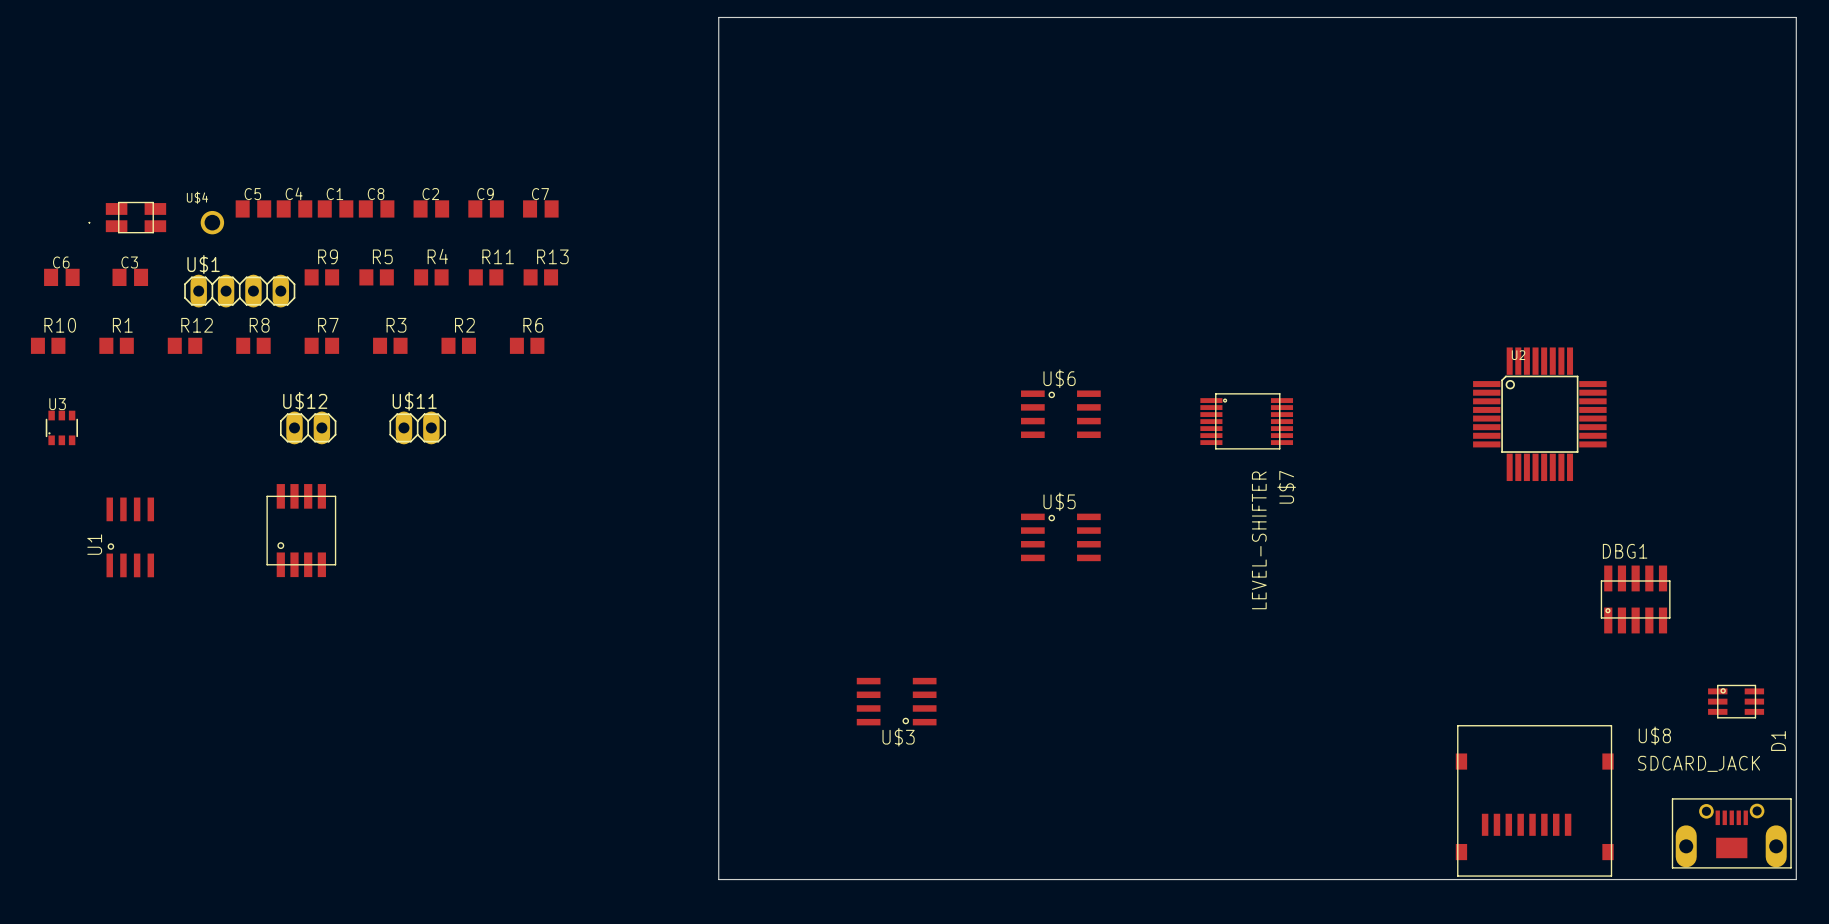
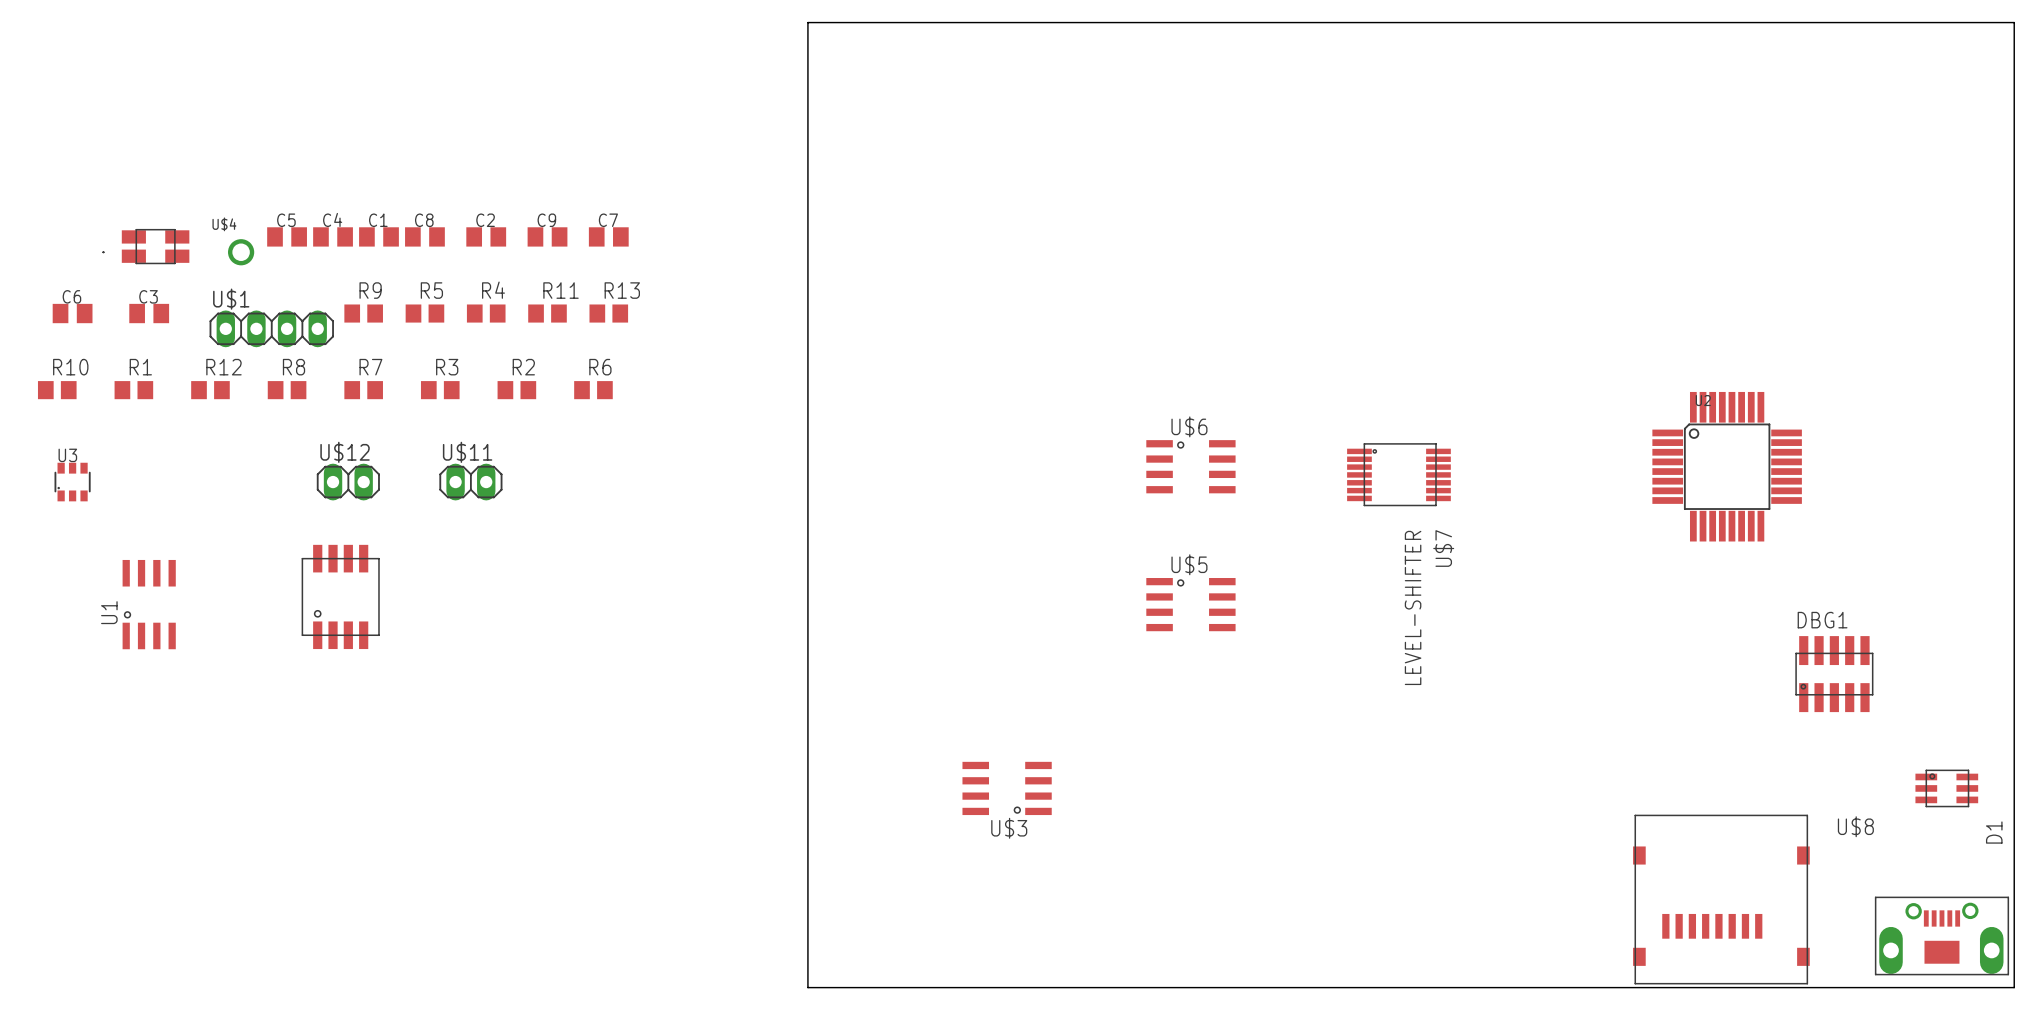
U$8 value: SDCARD_JACK (1699, 763) -> none

